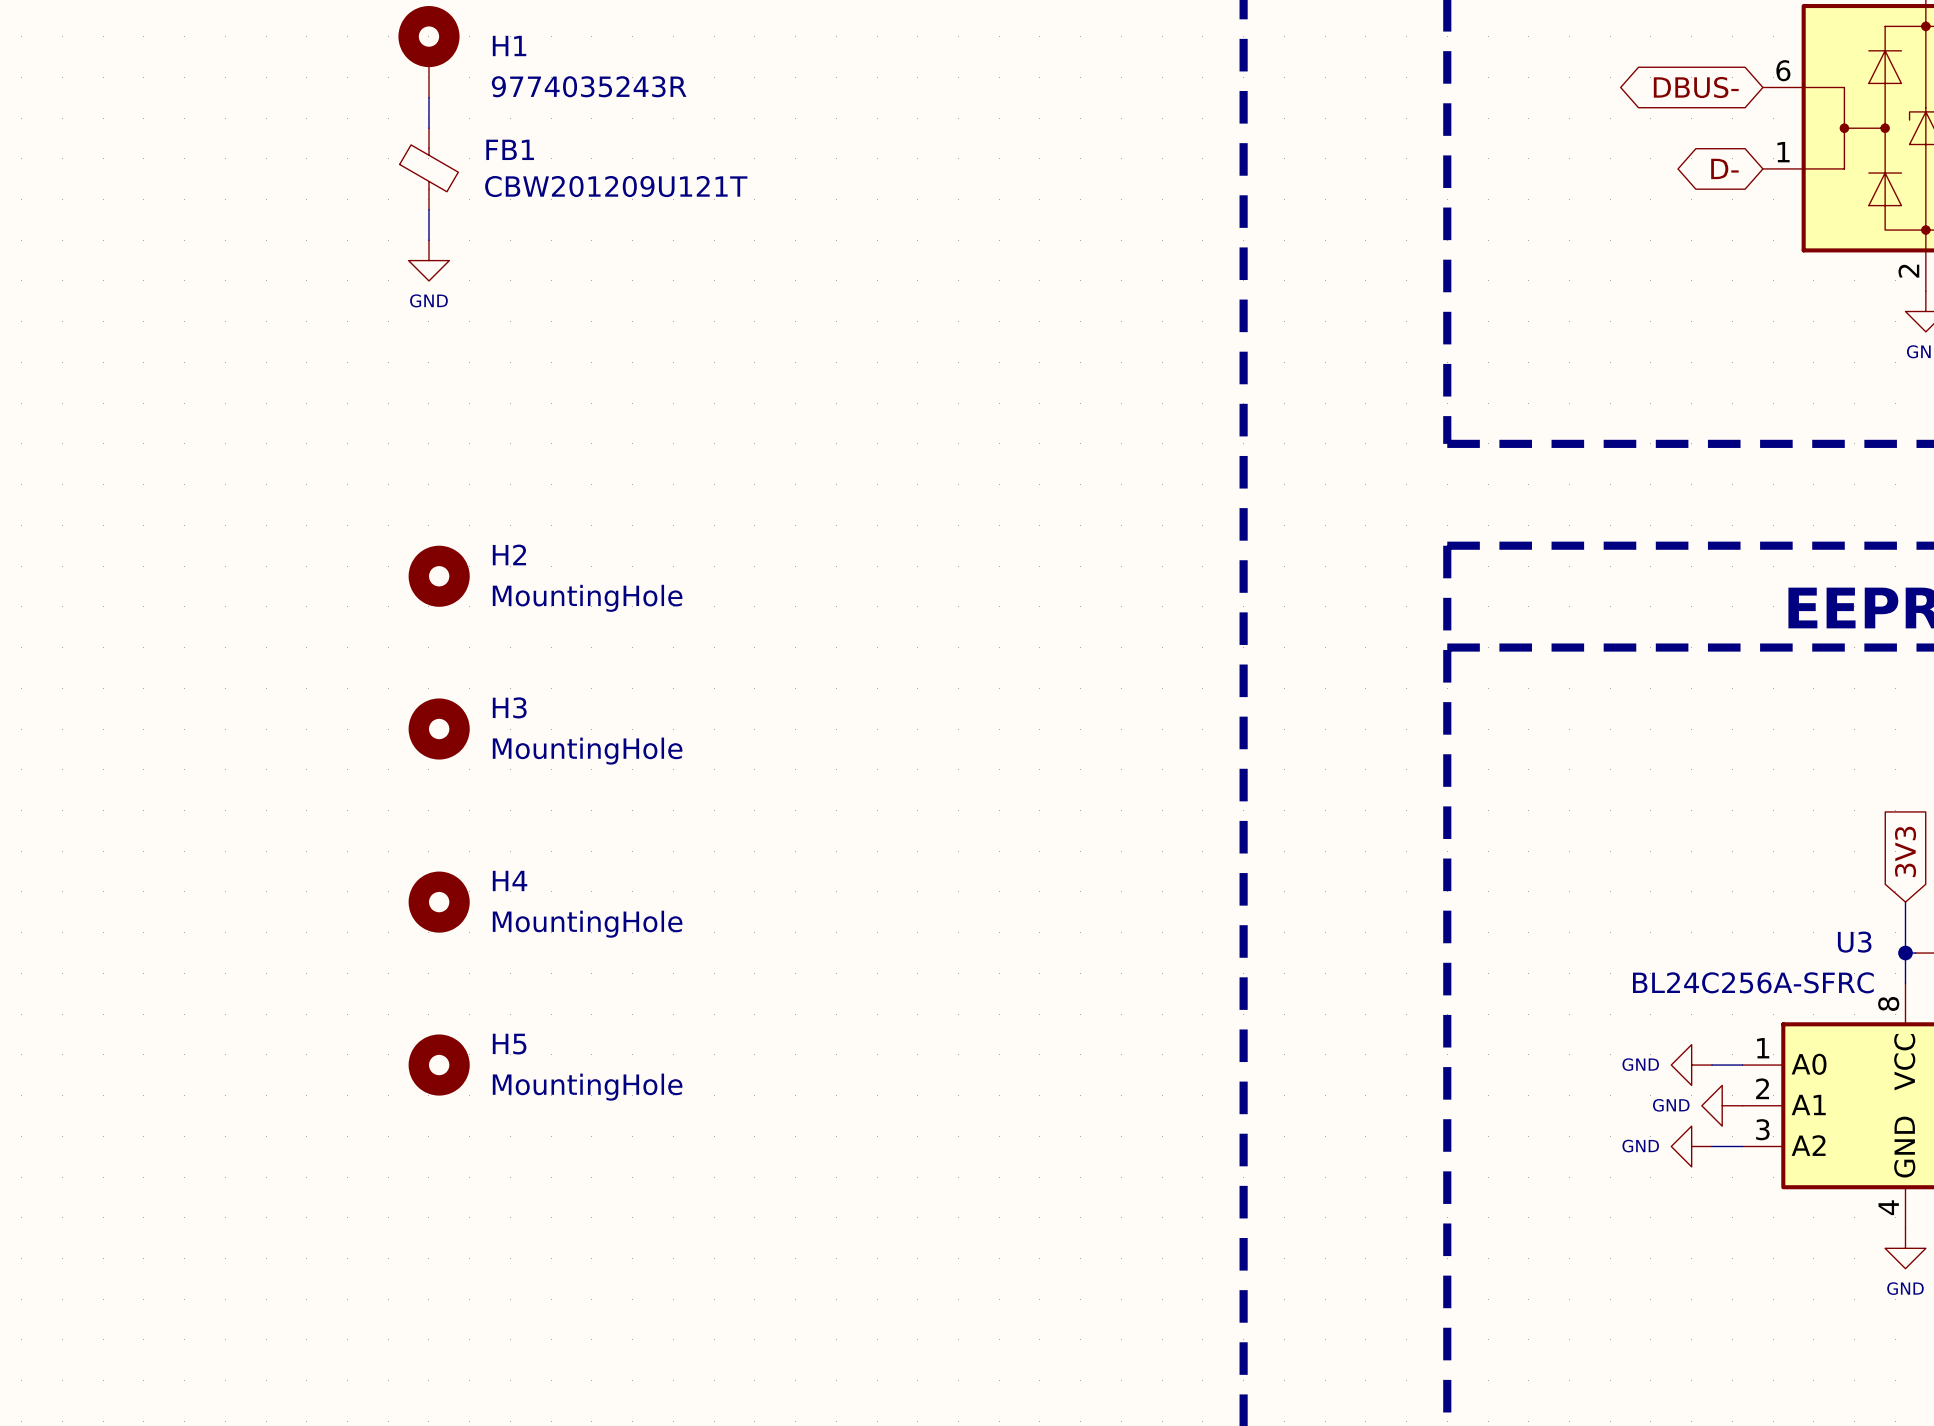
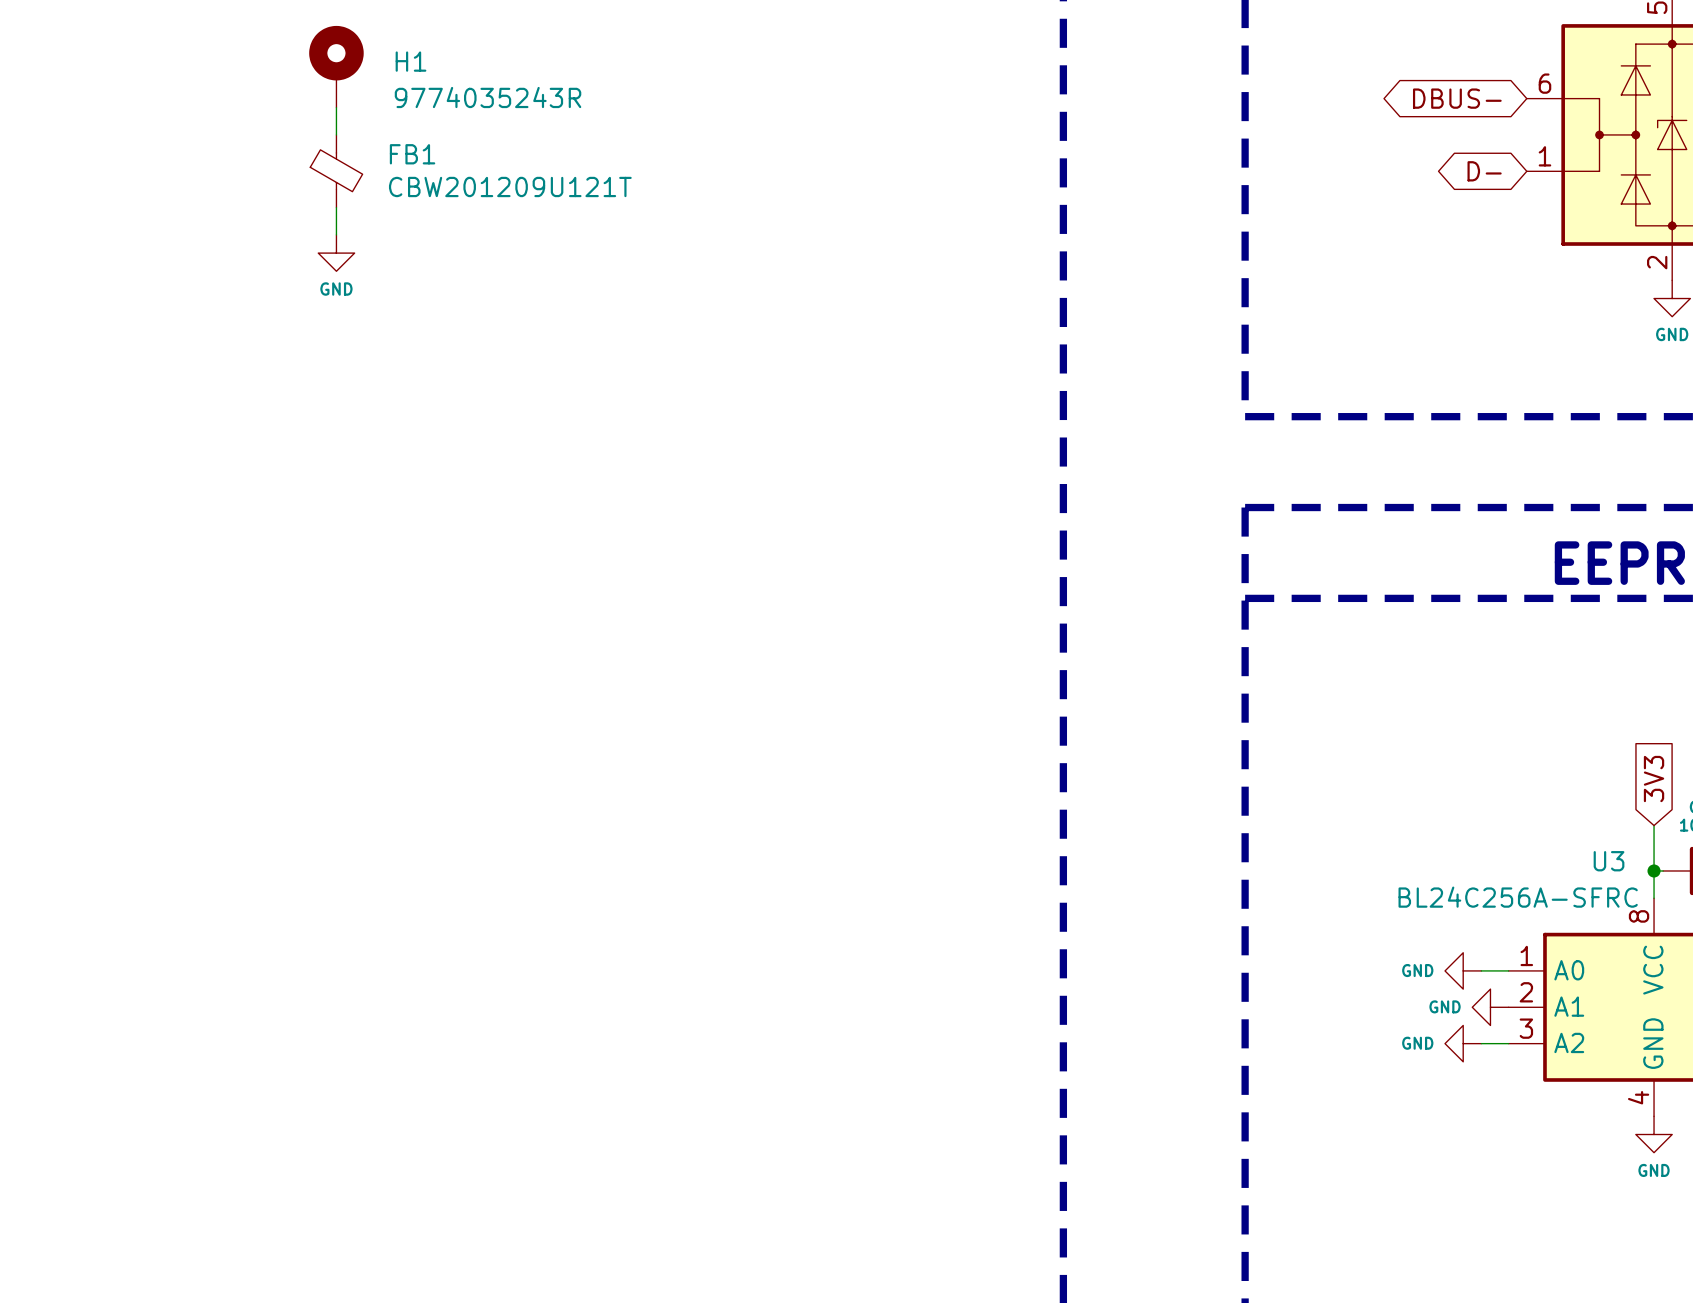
H2: MountingHole (439, 576) -> none
H3: MountingHole (439, 729) -> none
H4: MountingHole (439, 902) -> none
H5: MountingHole (439, 1065) -> none

